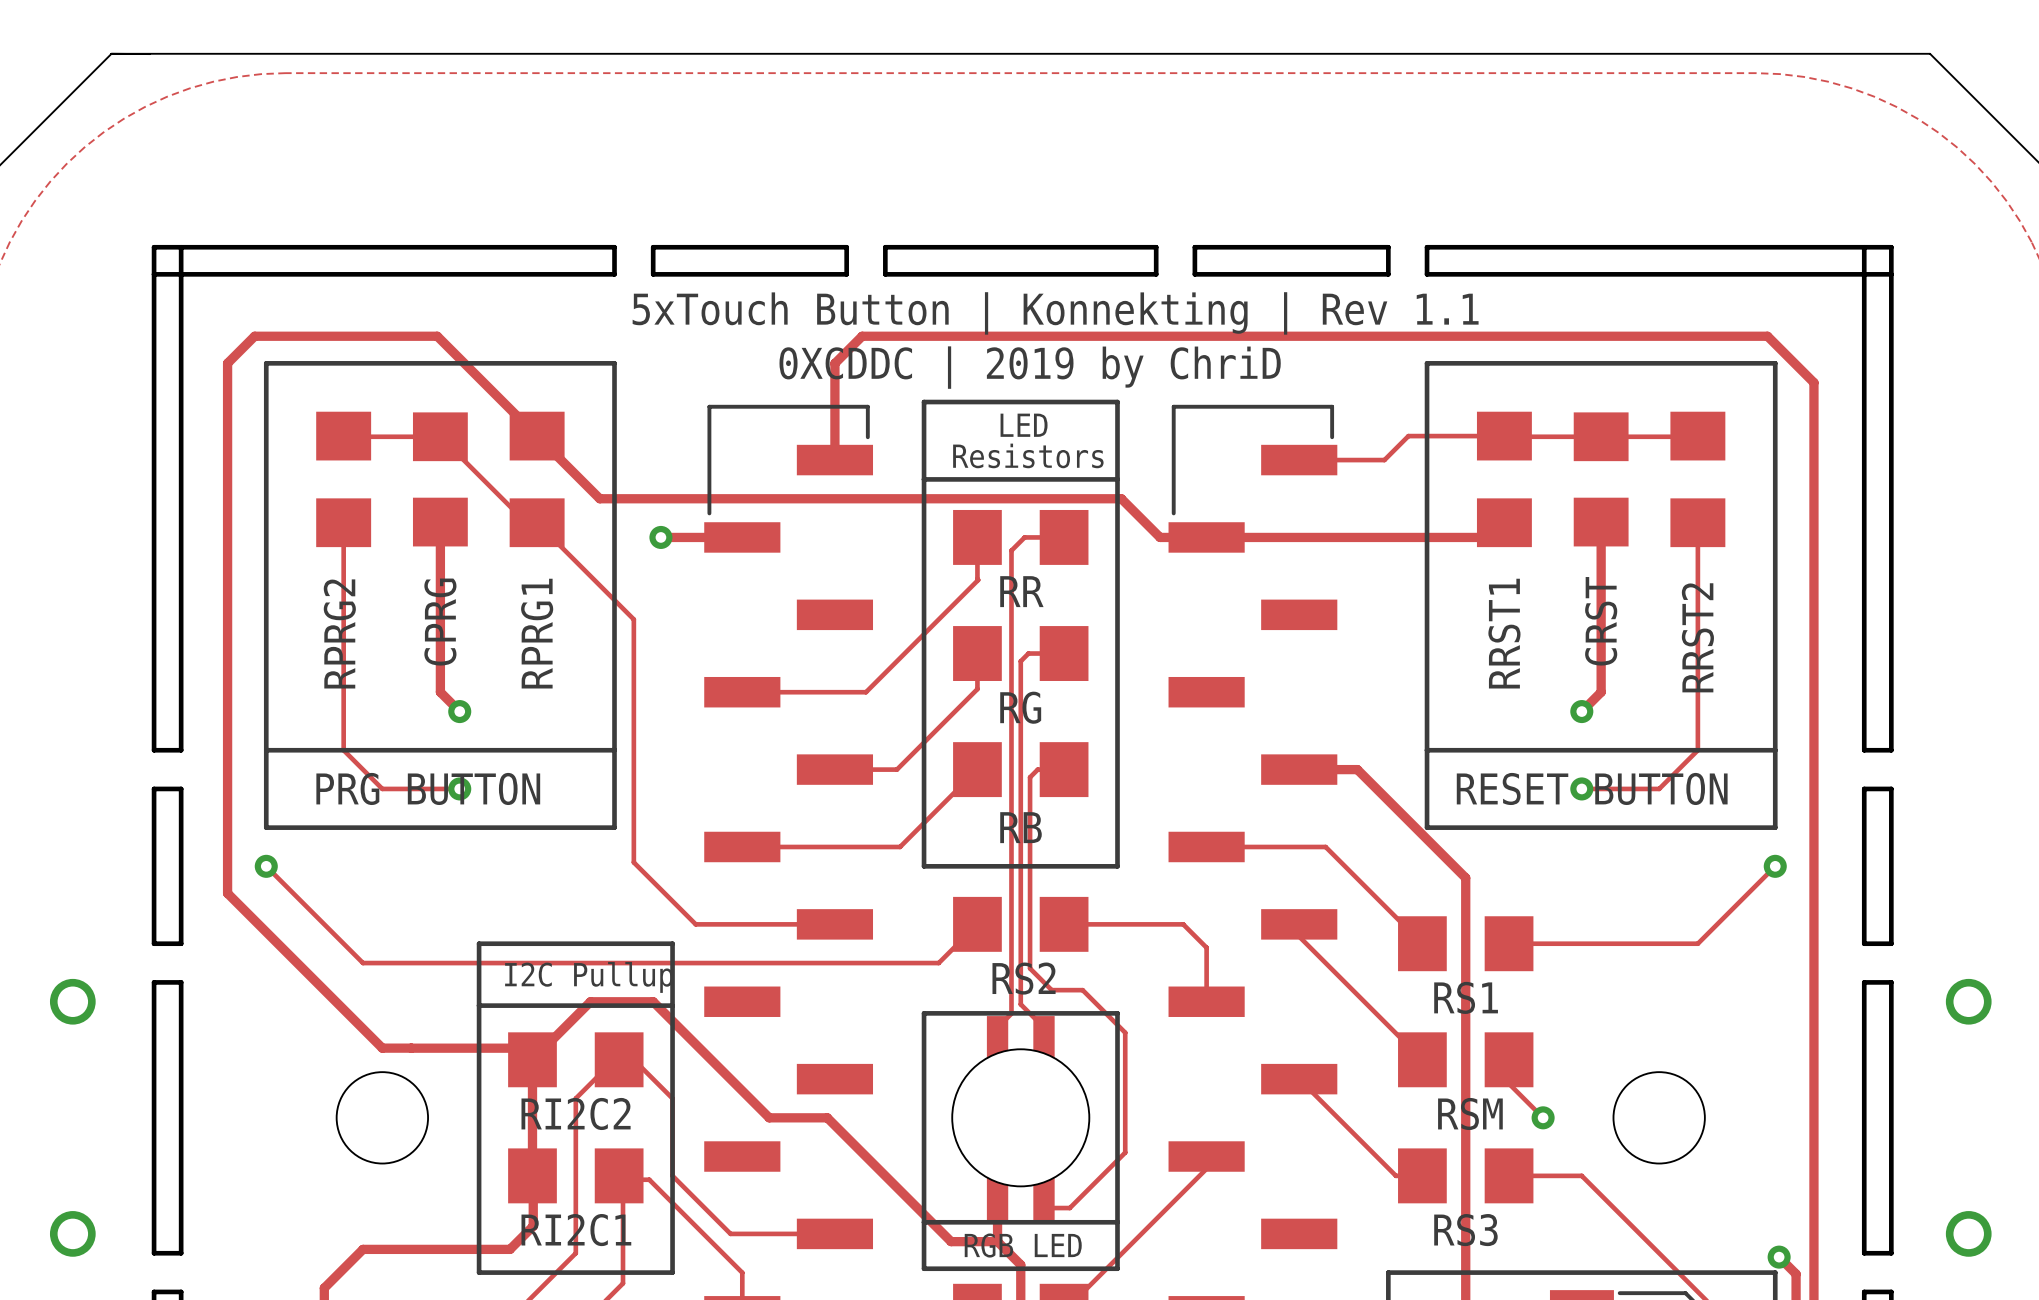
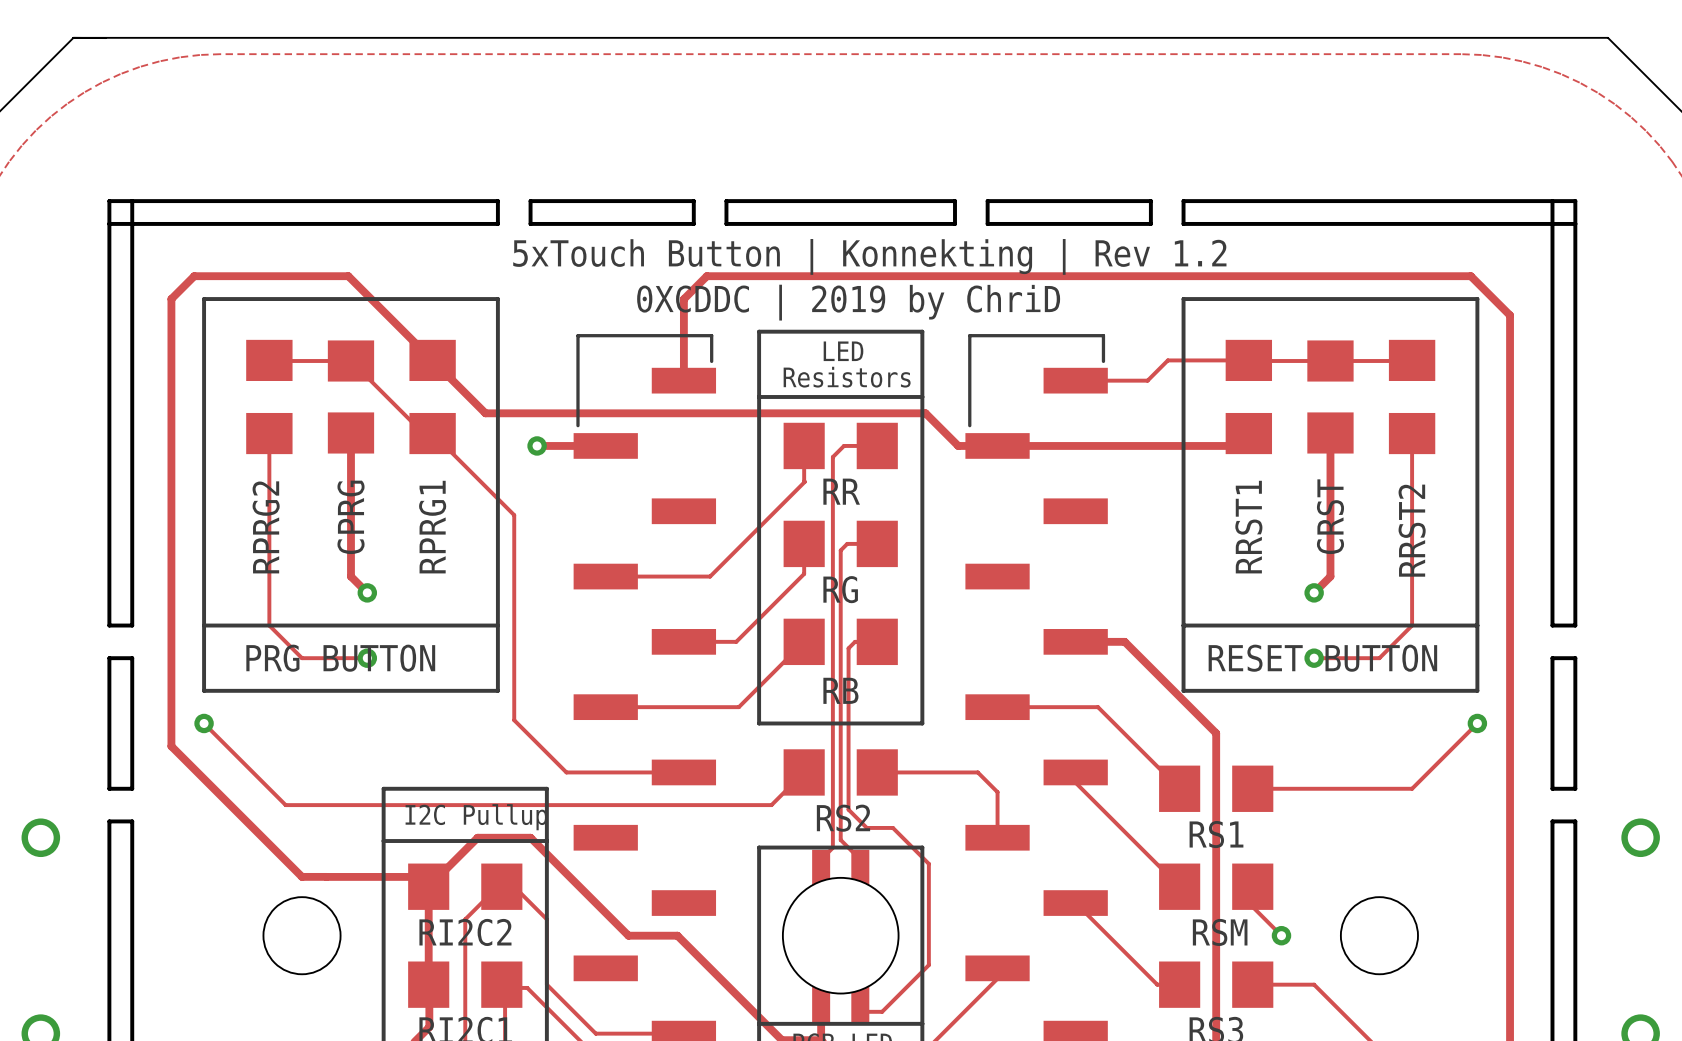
text: 5xTouch Button | Konnekting | Rev 1.1 (1055, 313) -> 5xTouch Button | Konnekting | Rev 1.2 (869, 256)

